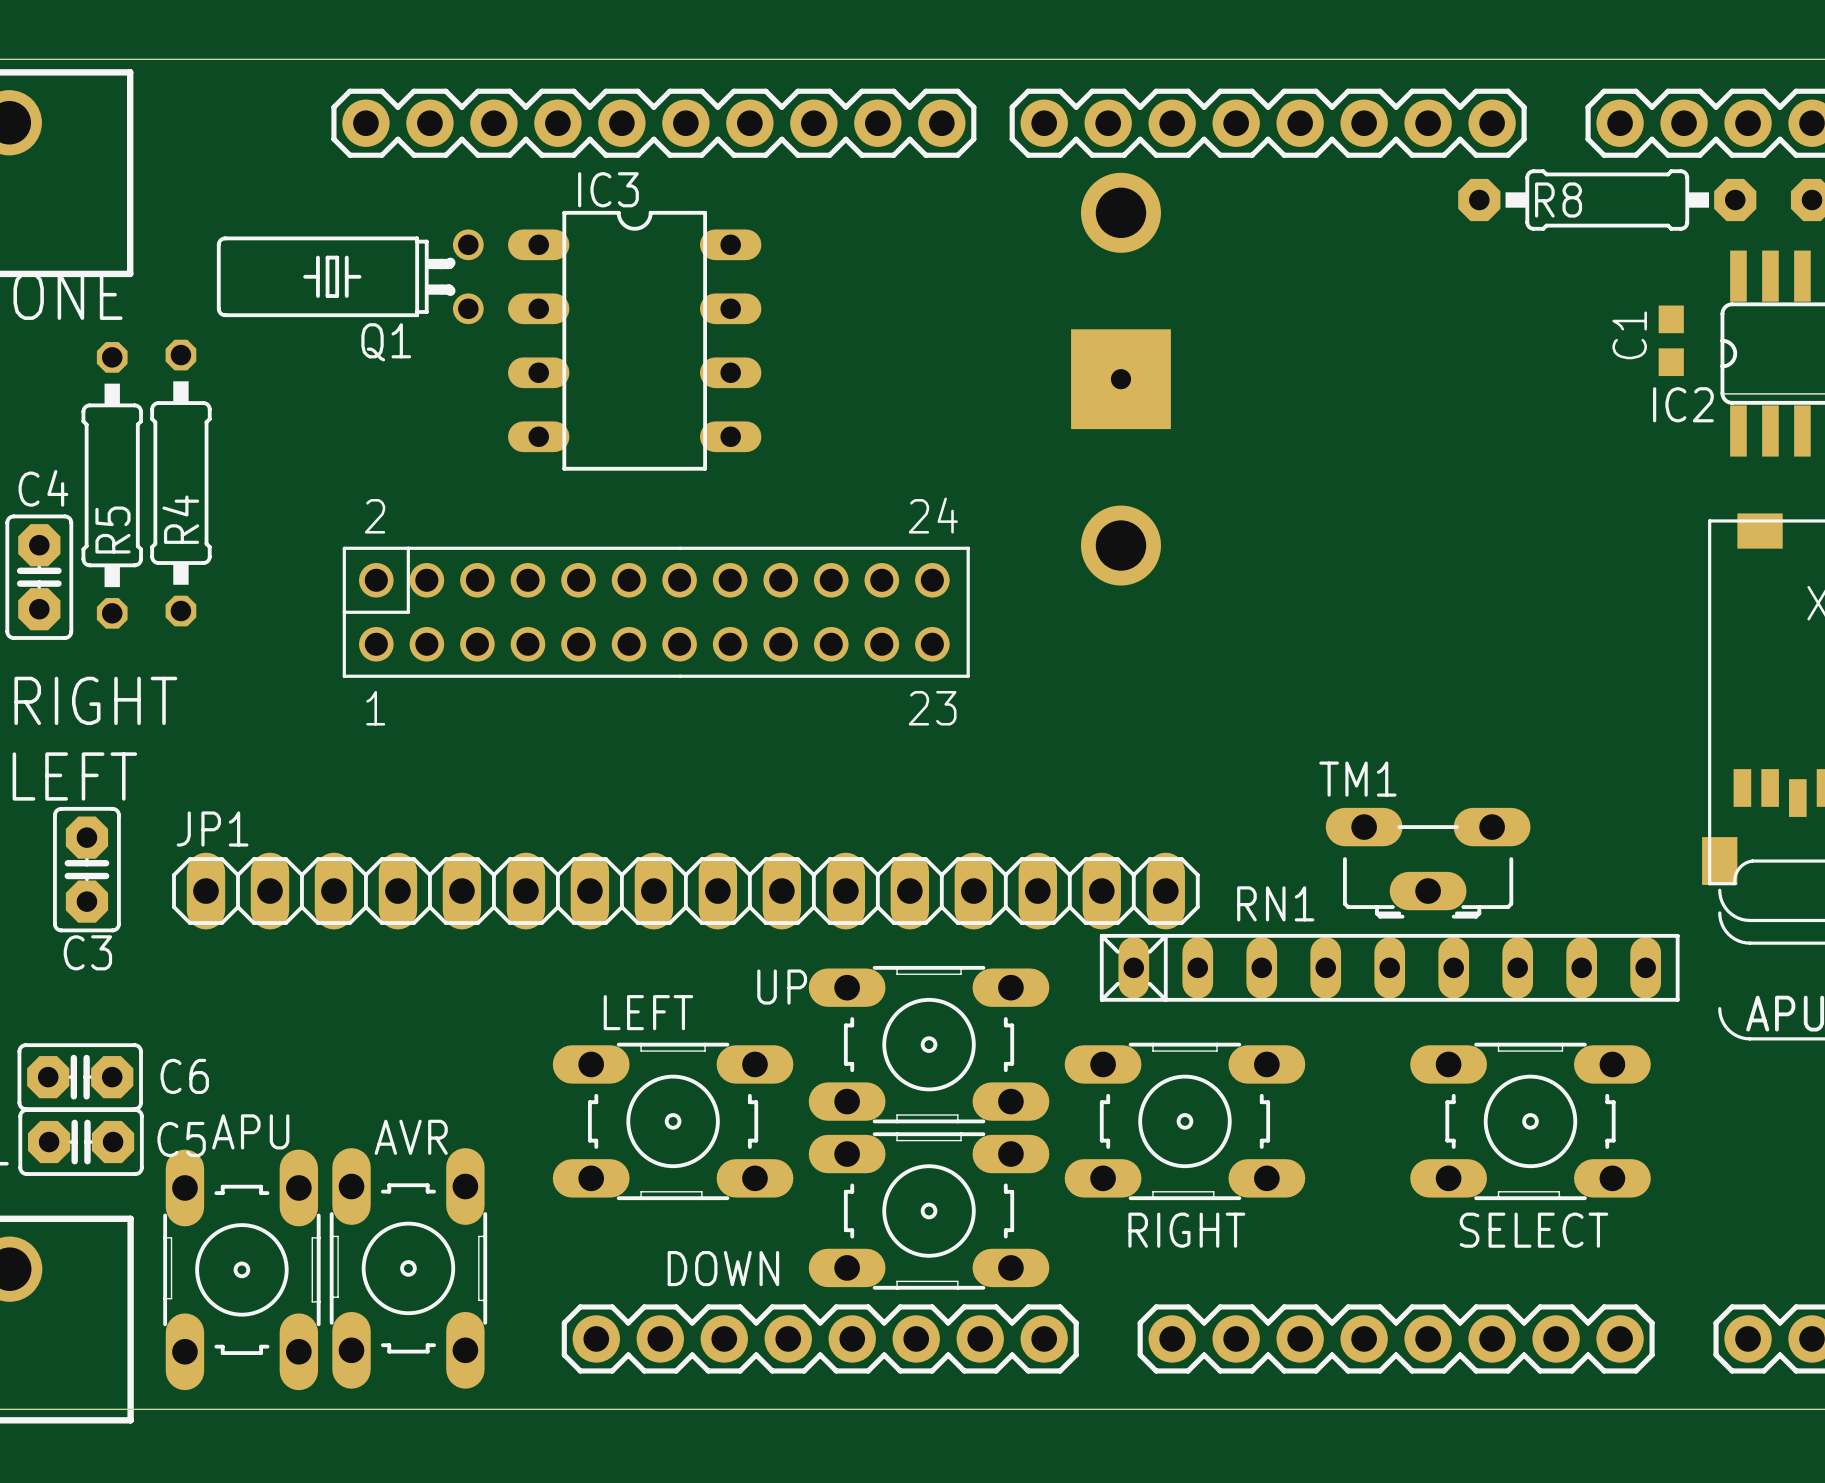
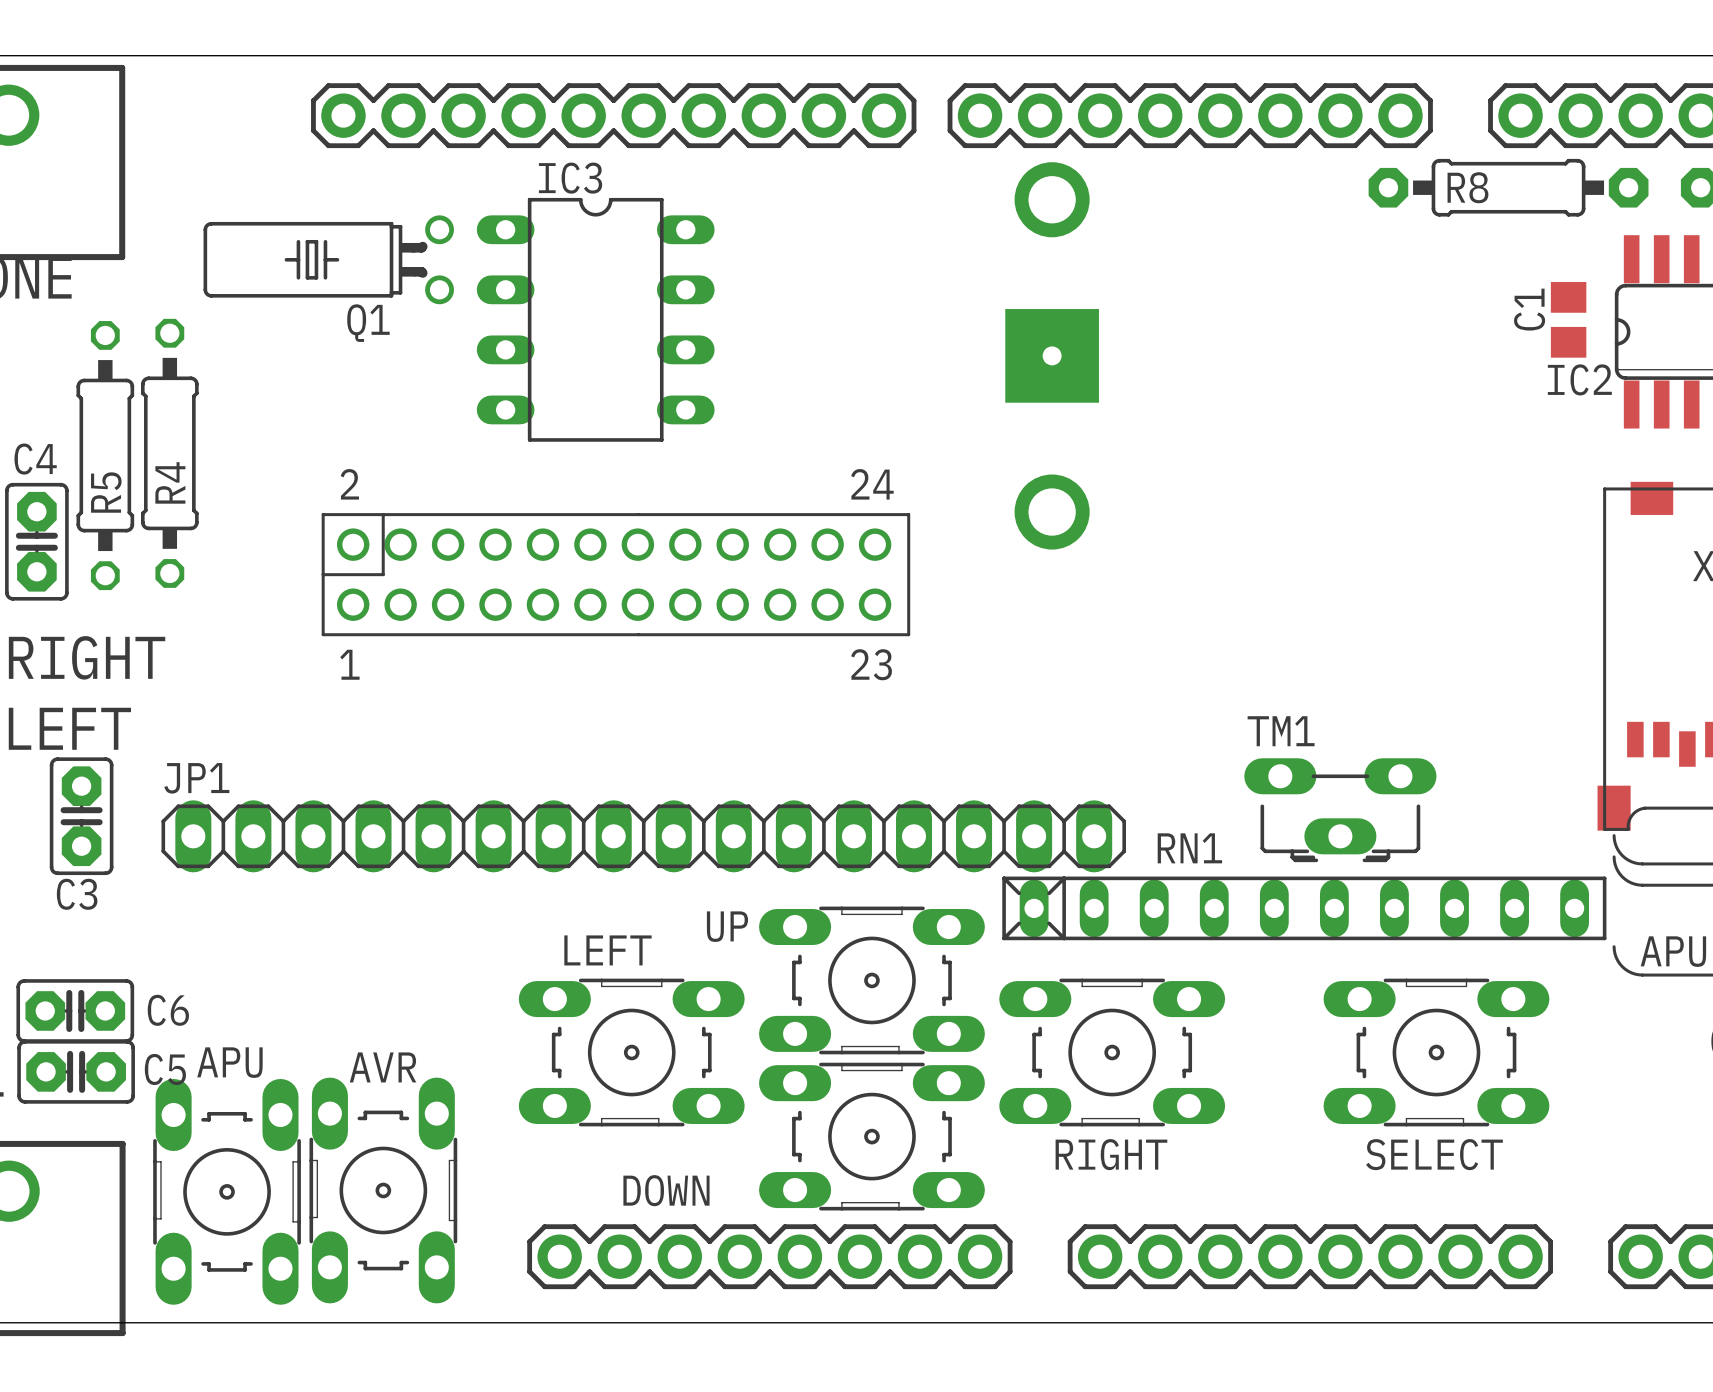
C1 footprint: [1658, 305, 1684, 377] -> [1550, 282, 1587, 358]
RN1 footprint: [1099, 933, 1680, 1002] -> [1002, 876, 1607, 941]

